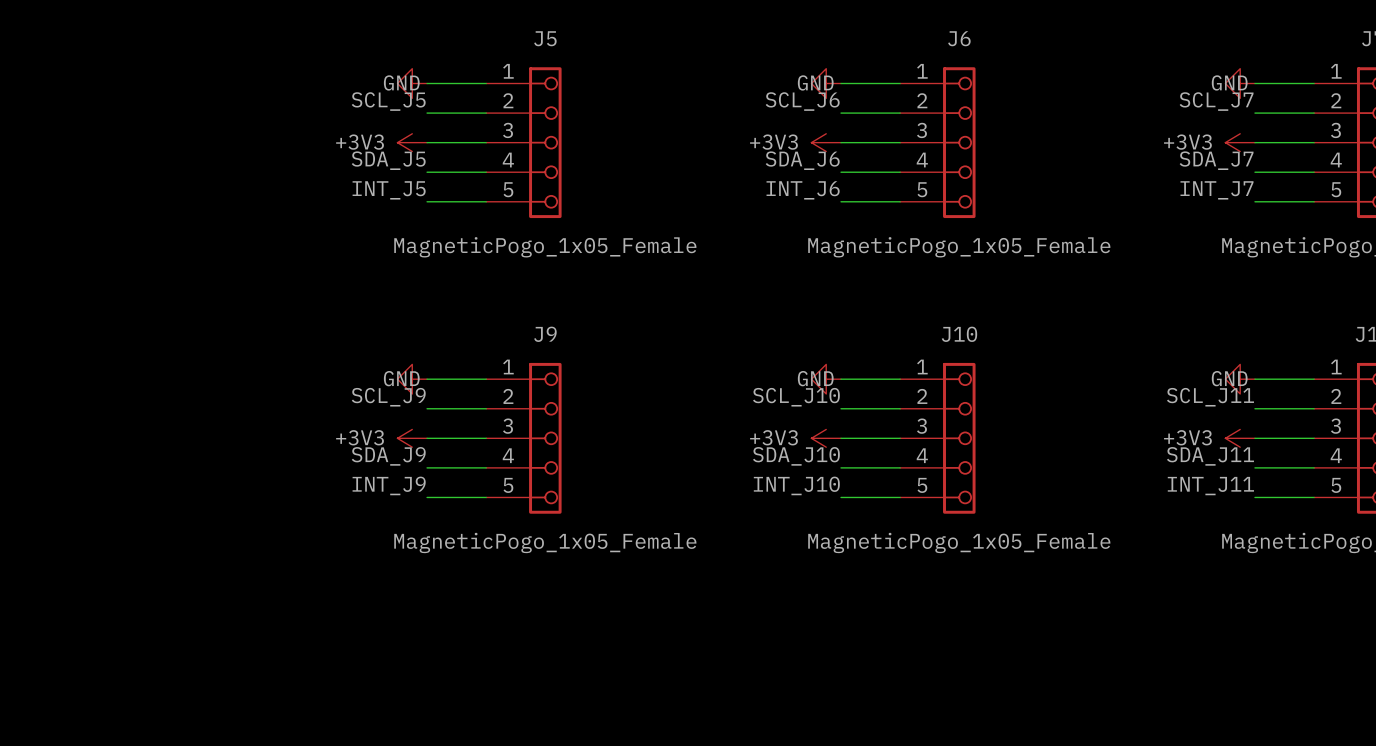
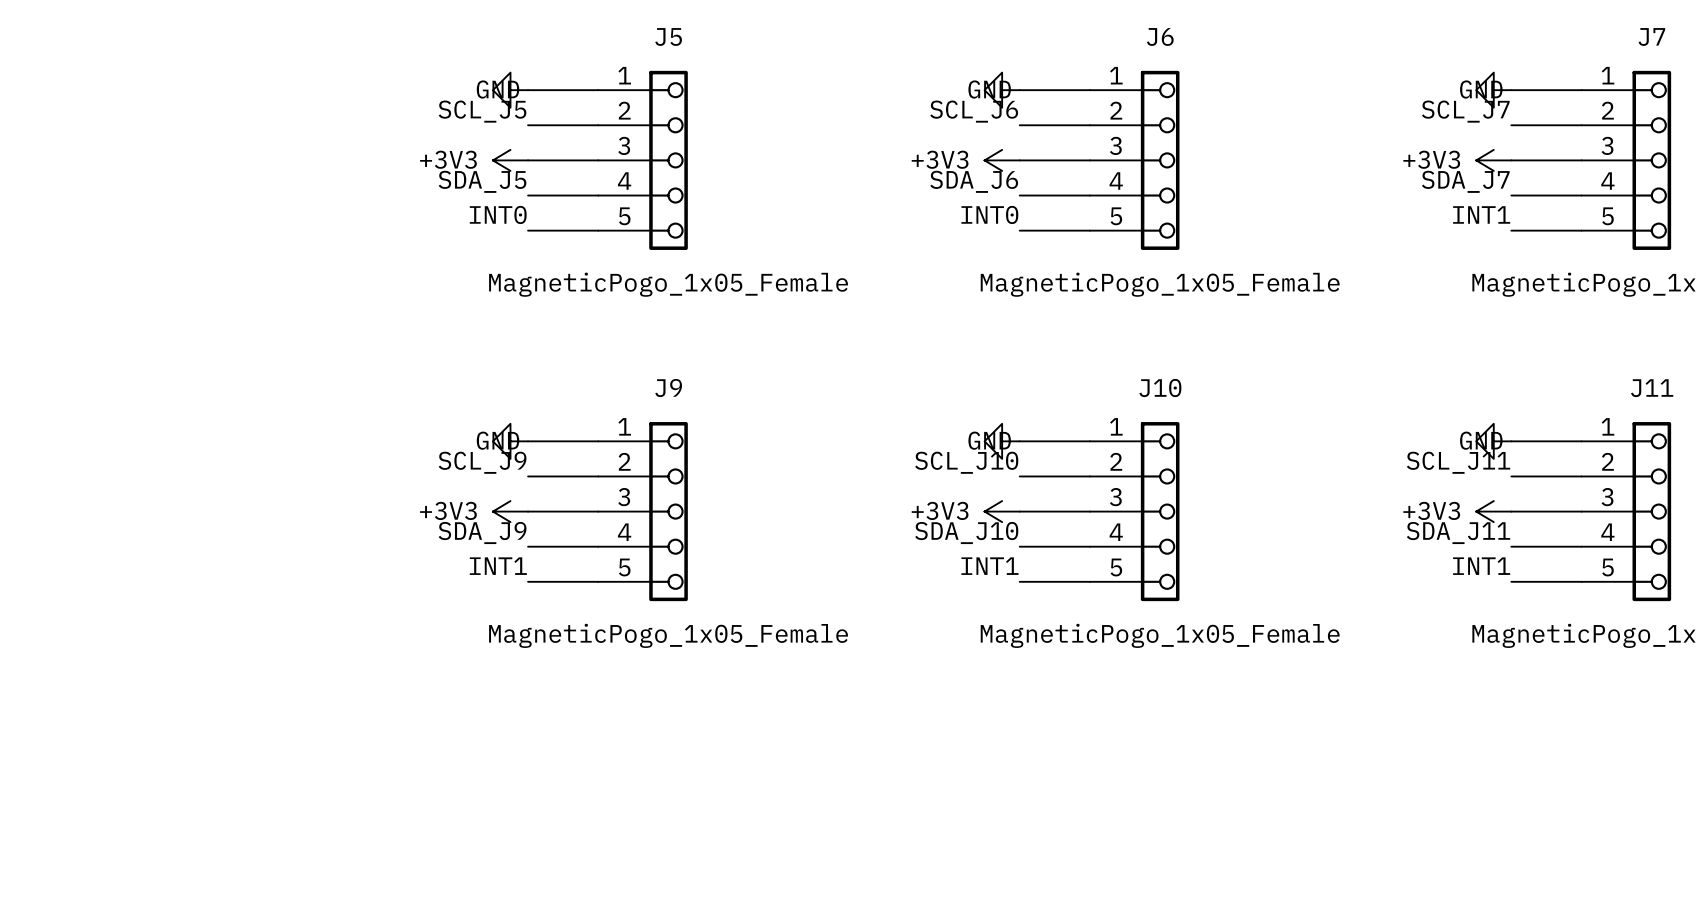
label: INT_J5 (389, 190) -> INT0 (498, 214)
label: INT_J6 (803, 190) -> INT0 (989, 214)
label: INT_J7 (1217, 190) -> INT1 (1481, 214)
label: INT_J9 (389, 485) -> INT1 (498, 566)
label: INT_J10 (796, 485) -> INT1 (989, 566)
label: INT_J11 (1210, 486) -> INT1 (1481, 566)

